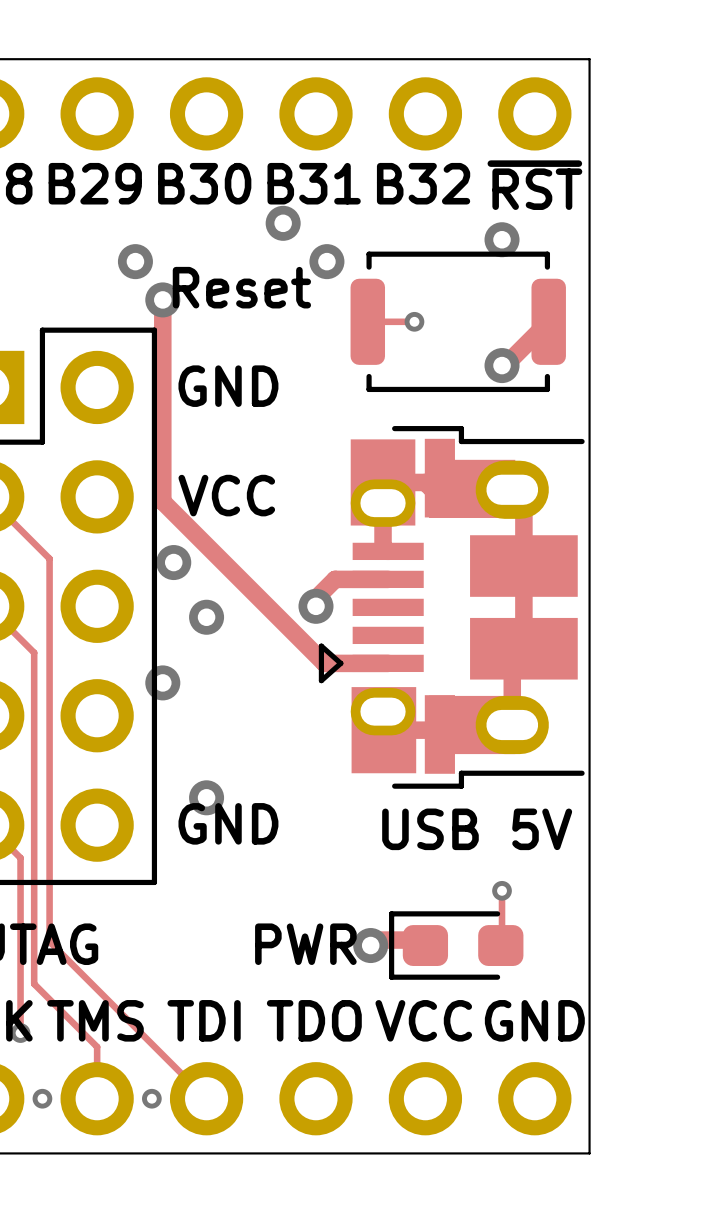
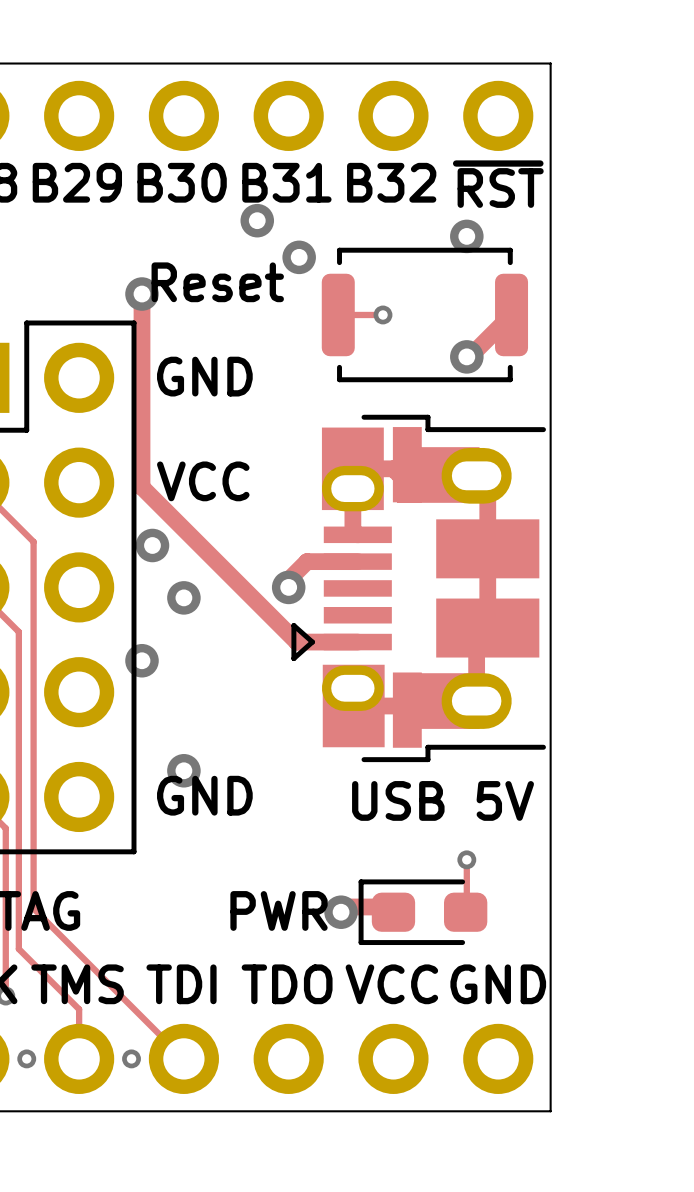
via: (135, 261) -> none

